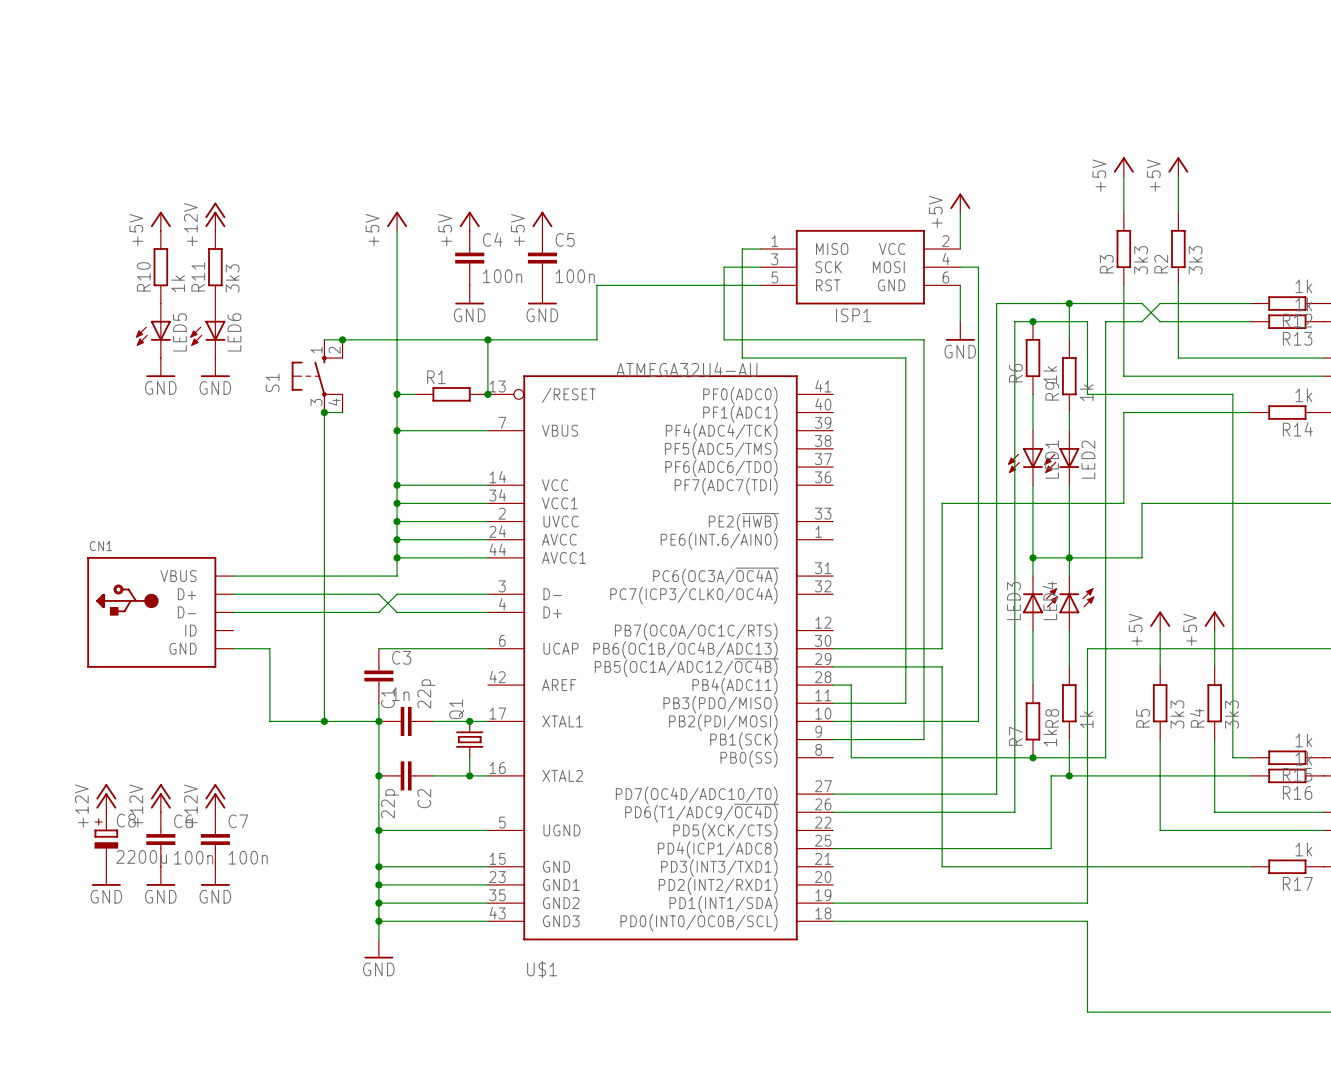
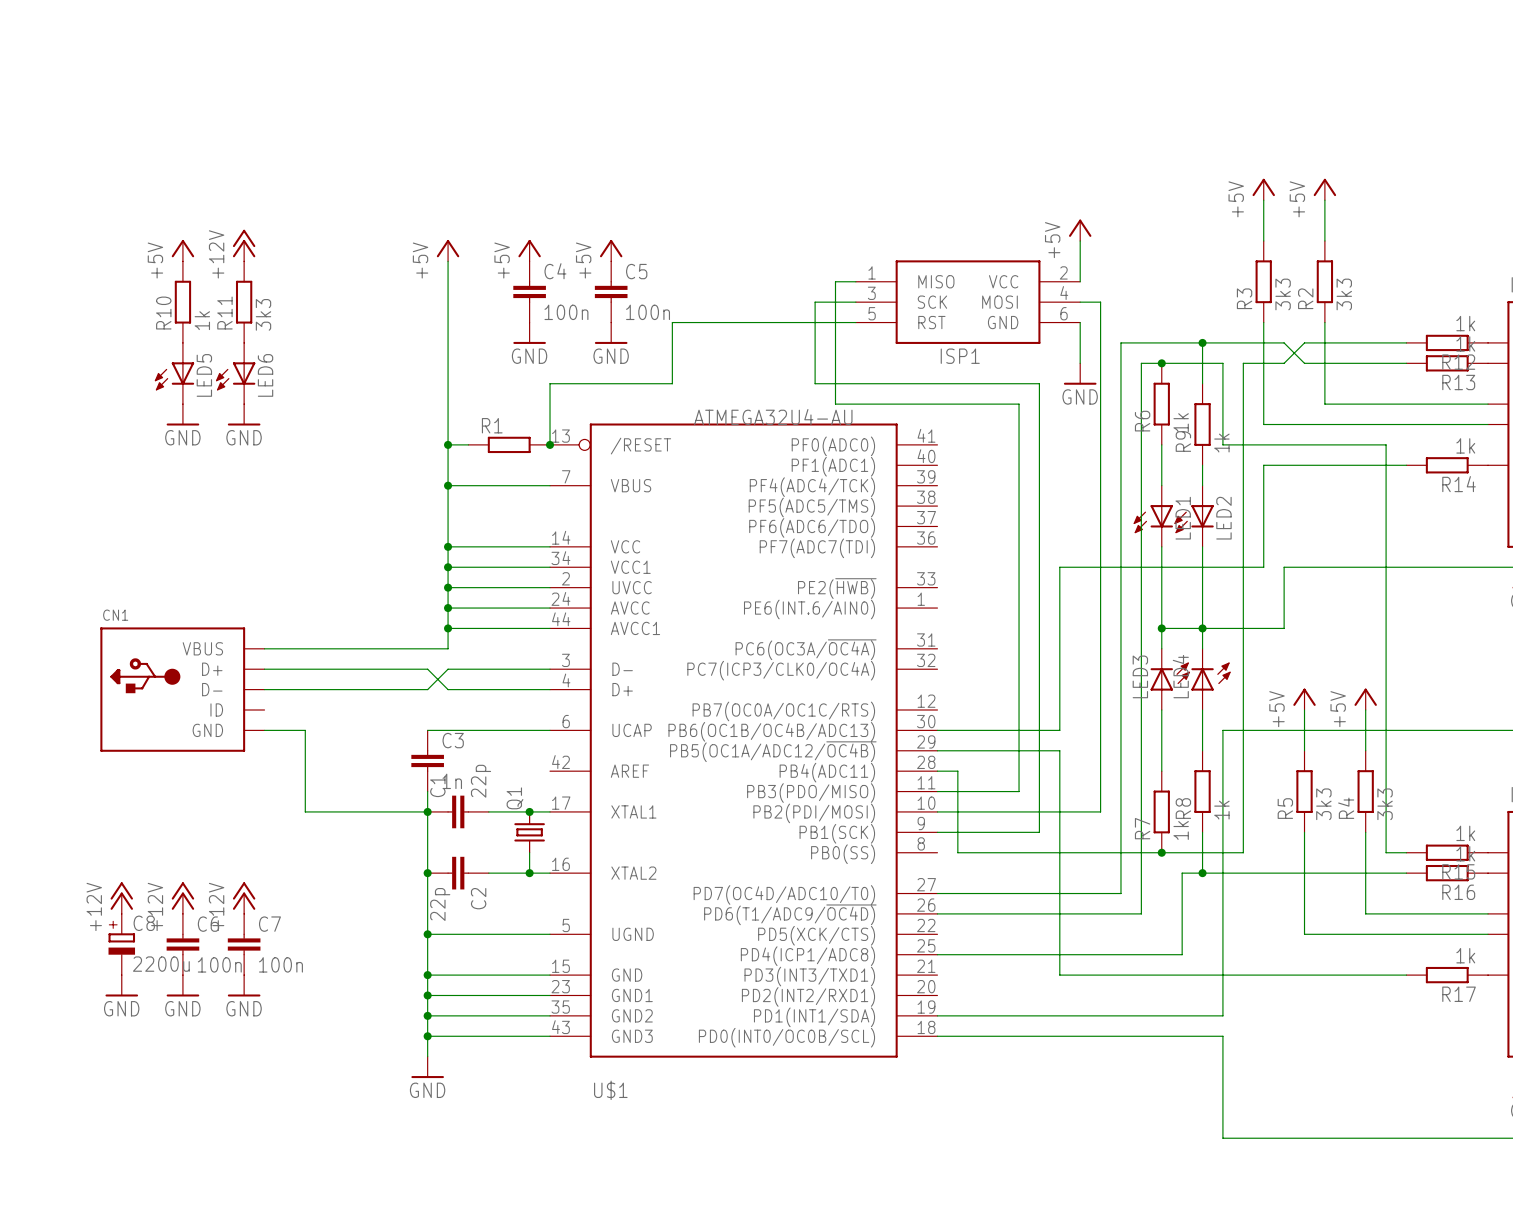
wire: (324, 339) (487, 339) -> none
junction: (342, 339) -> none
junction: (487, 339) -> none
S1: (317, 376) -> none
junction: (324, 412) -> none
wire: (342, 412) (324, 412) (324, 721) -> none
junction: (324, 721) -> none

